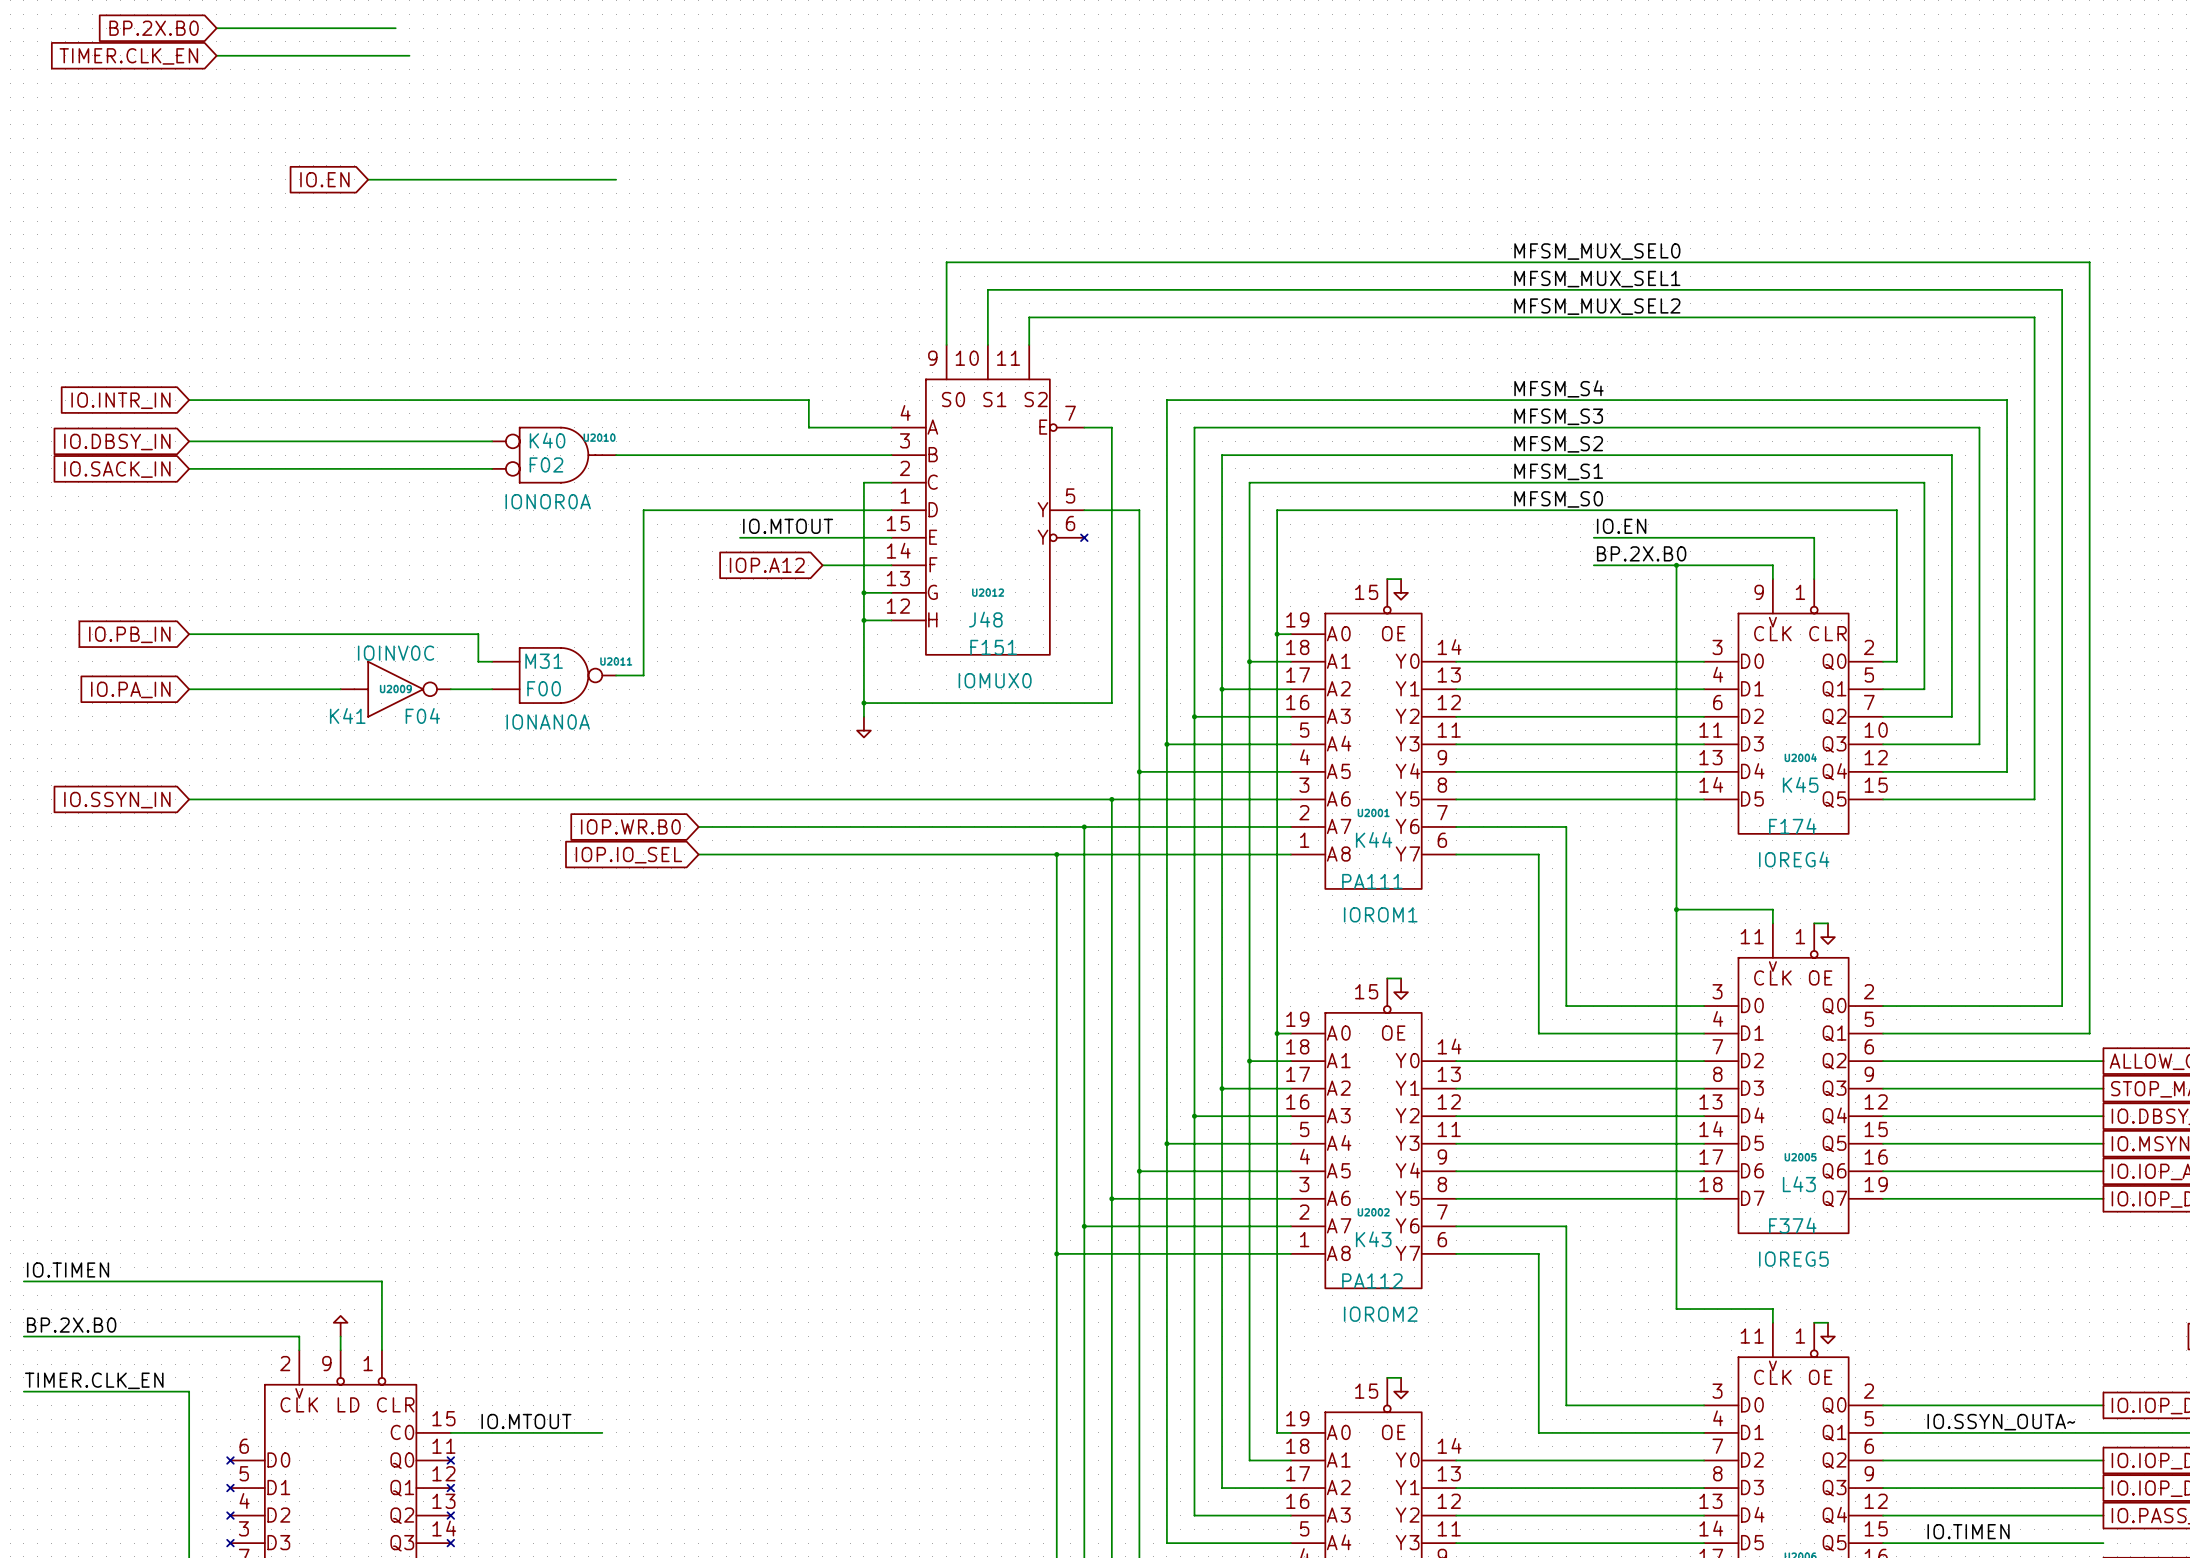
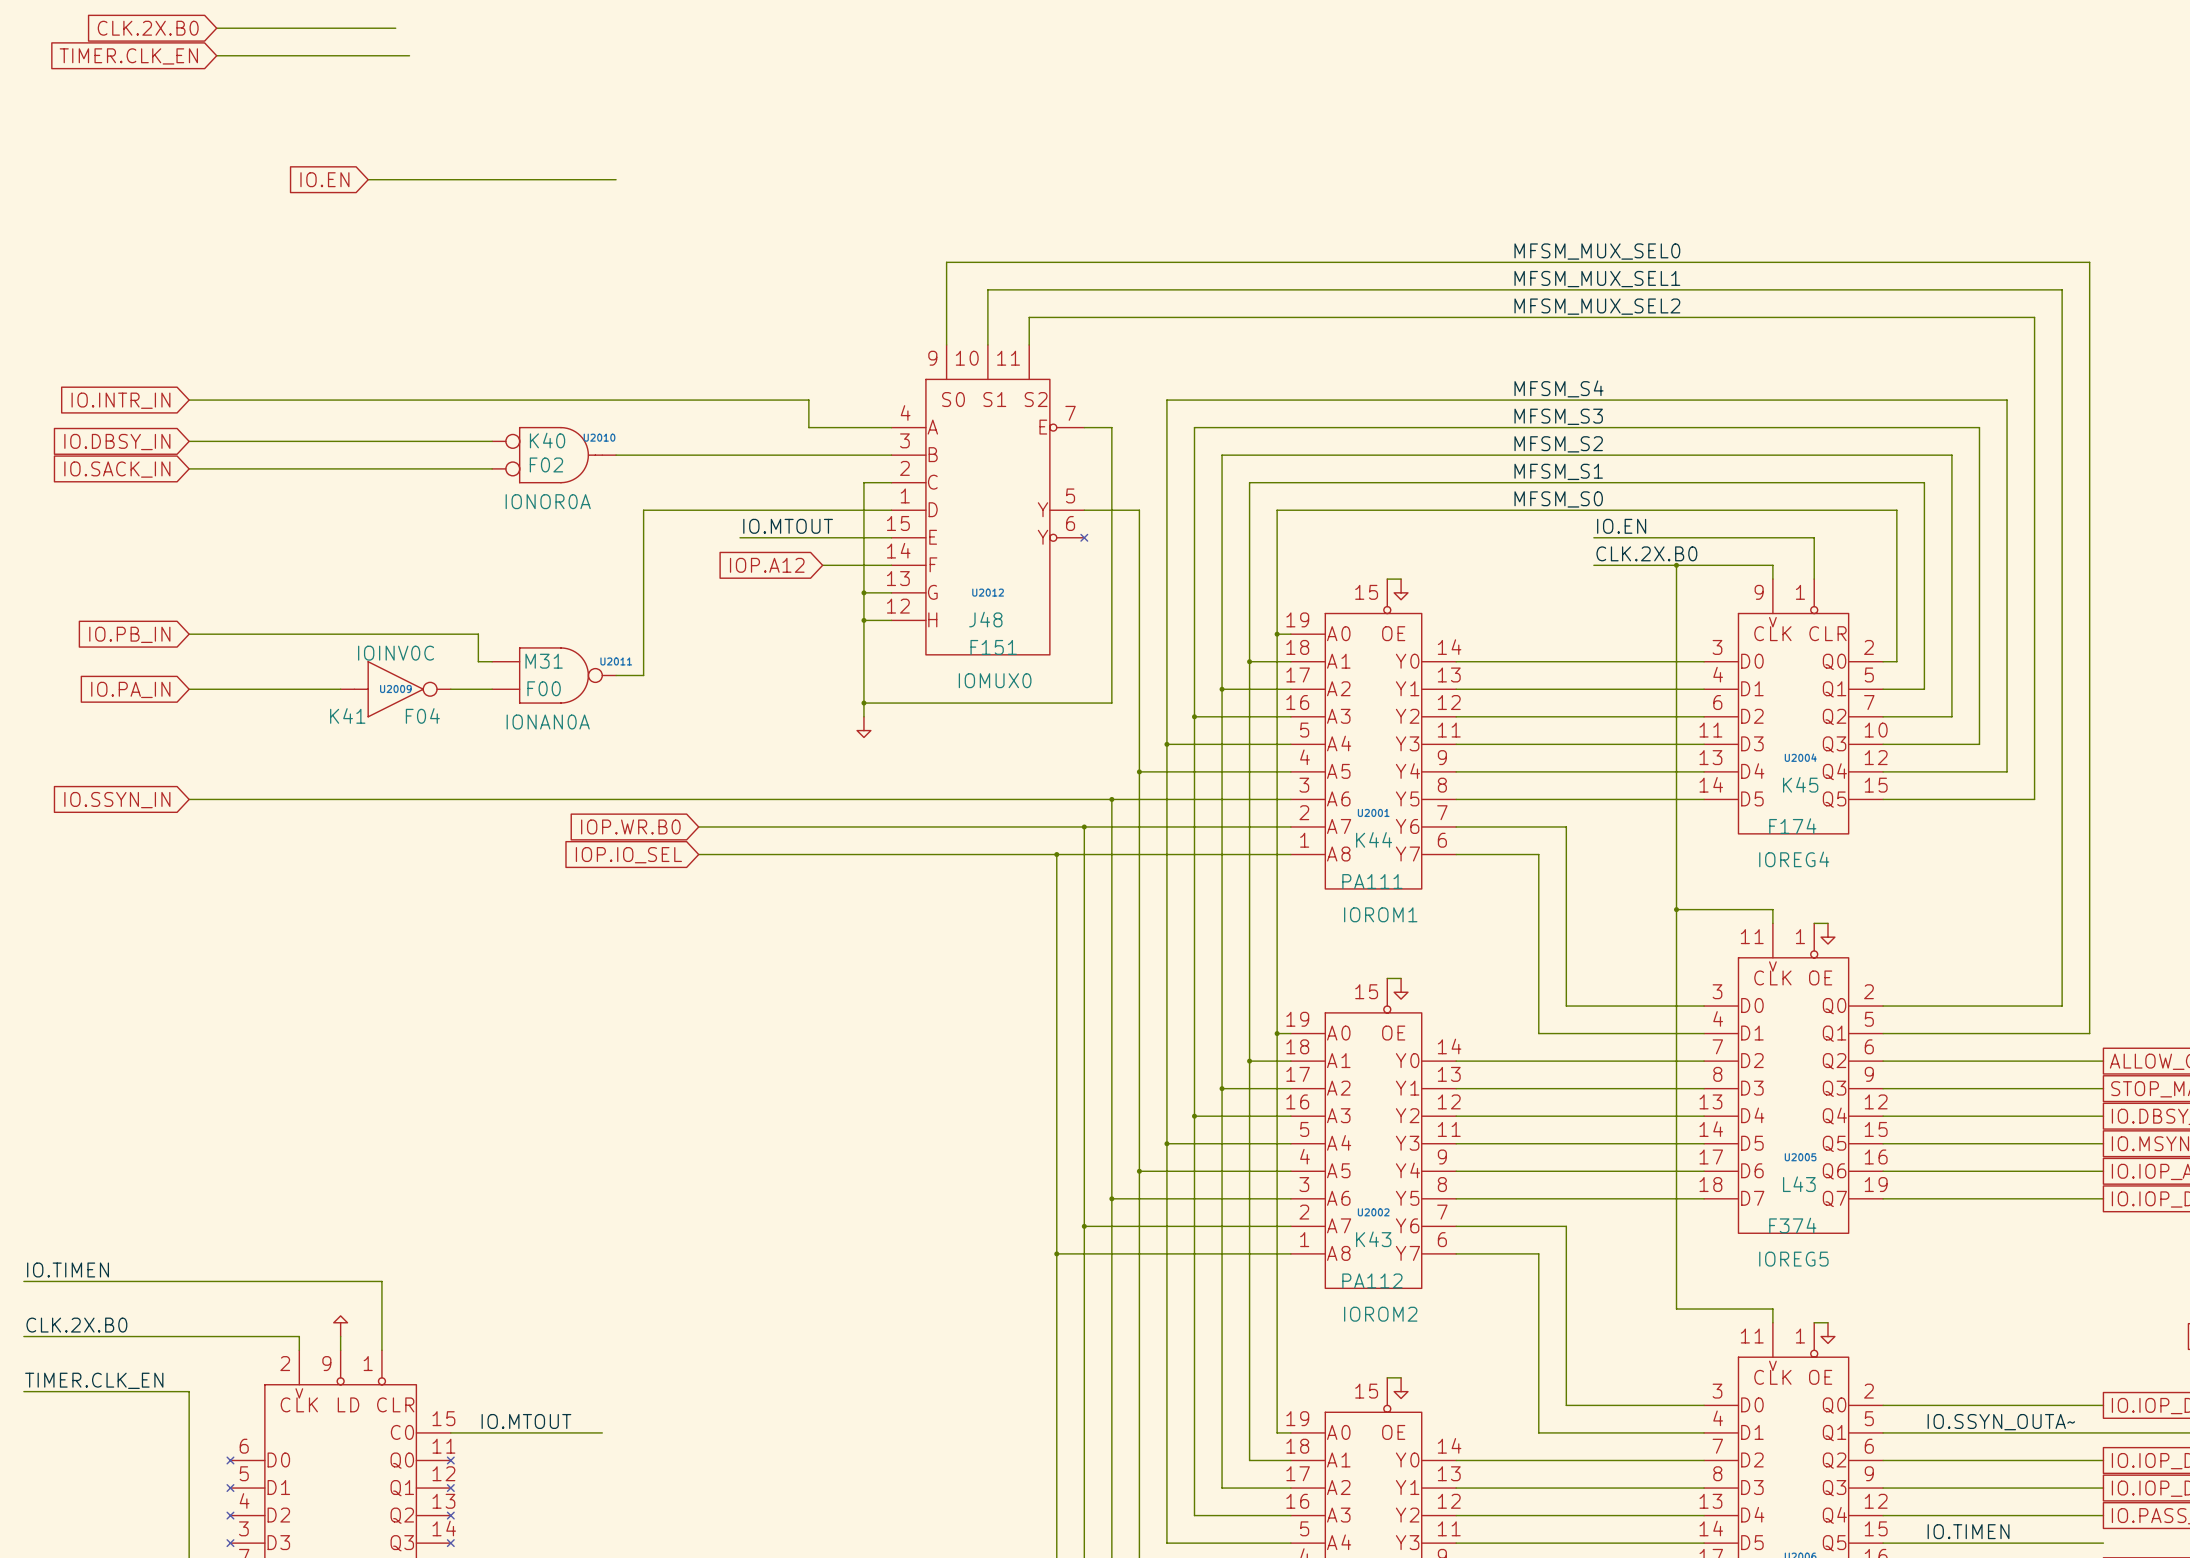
global label: BP.2X.B0 (154, 28) -> CLK.2X.B0 (148, 28)
label: BP.2X.B0 (1641, 553) -> CLK.2X.B0 (1646, 553)
label: BP.2X.B0 (71, 1325) -> CLK.2X.B0 (76, 1325)

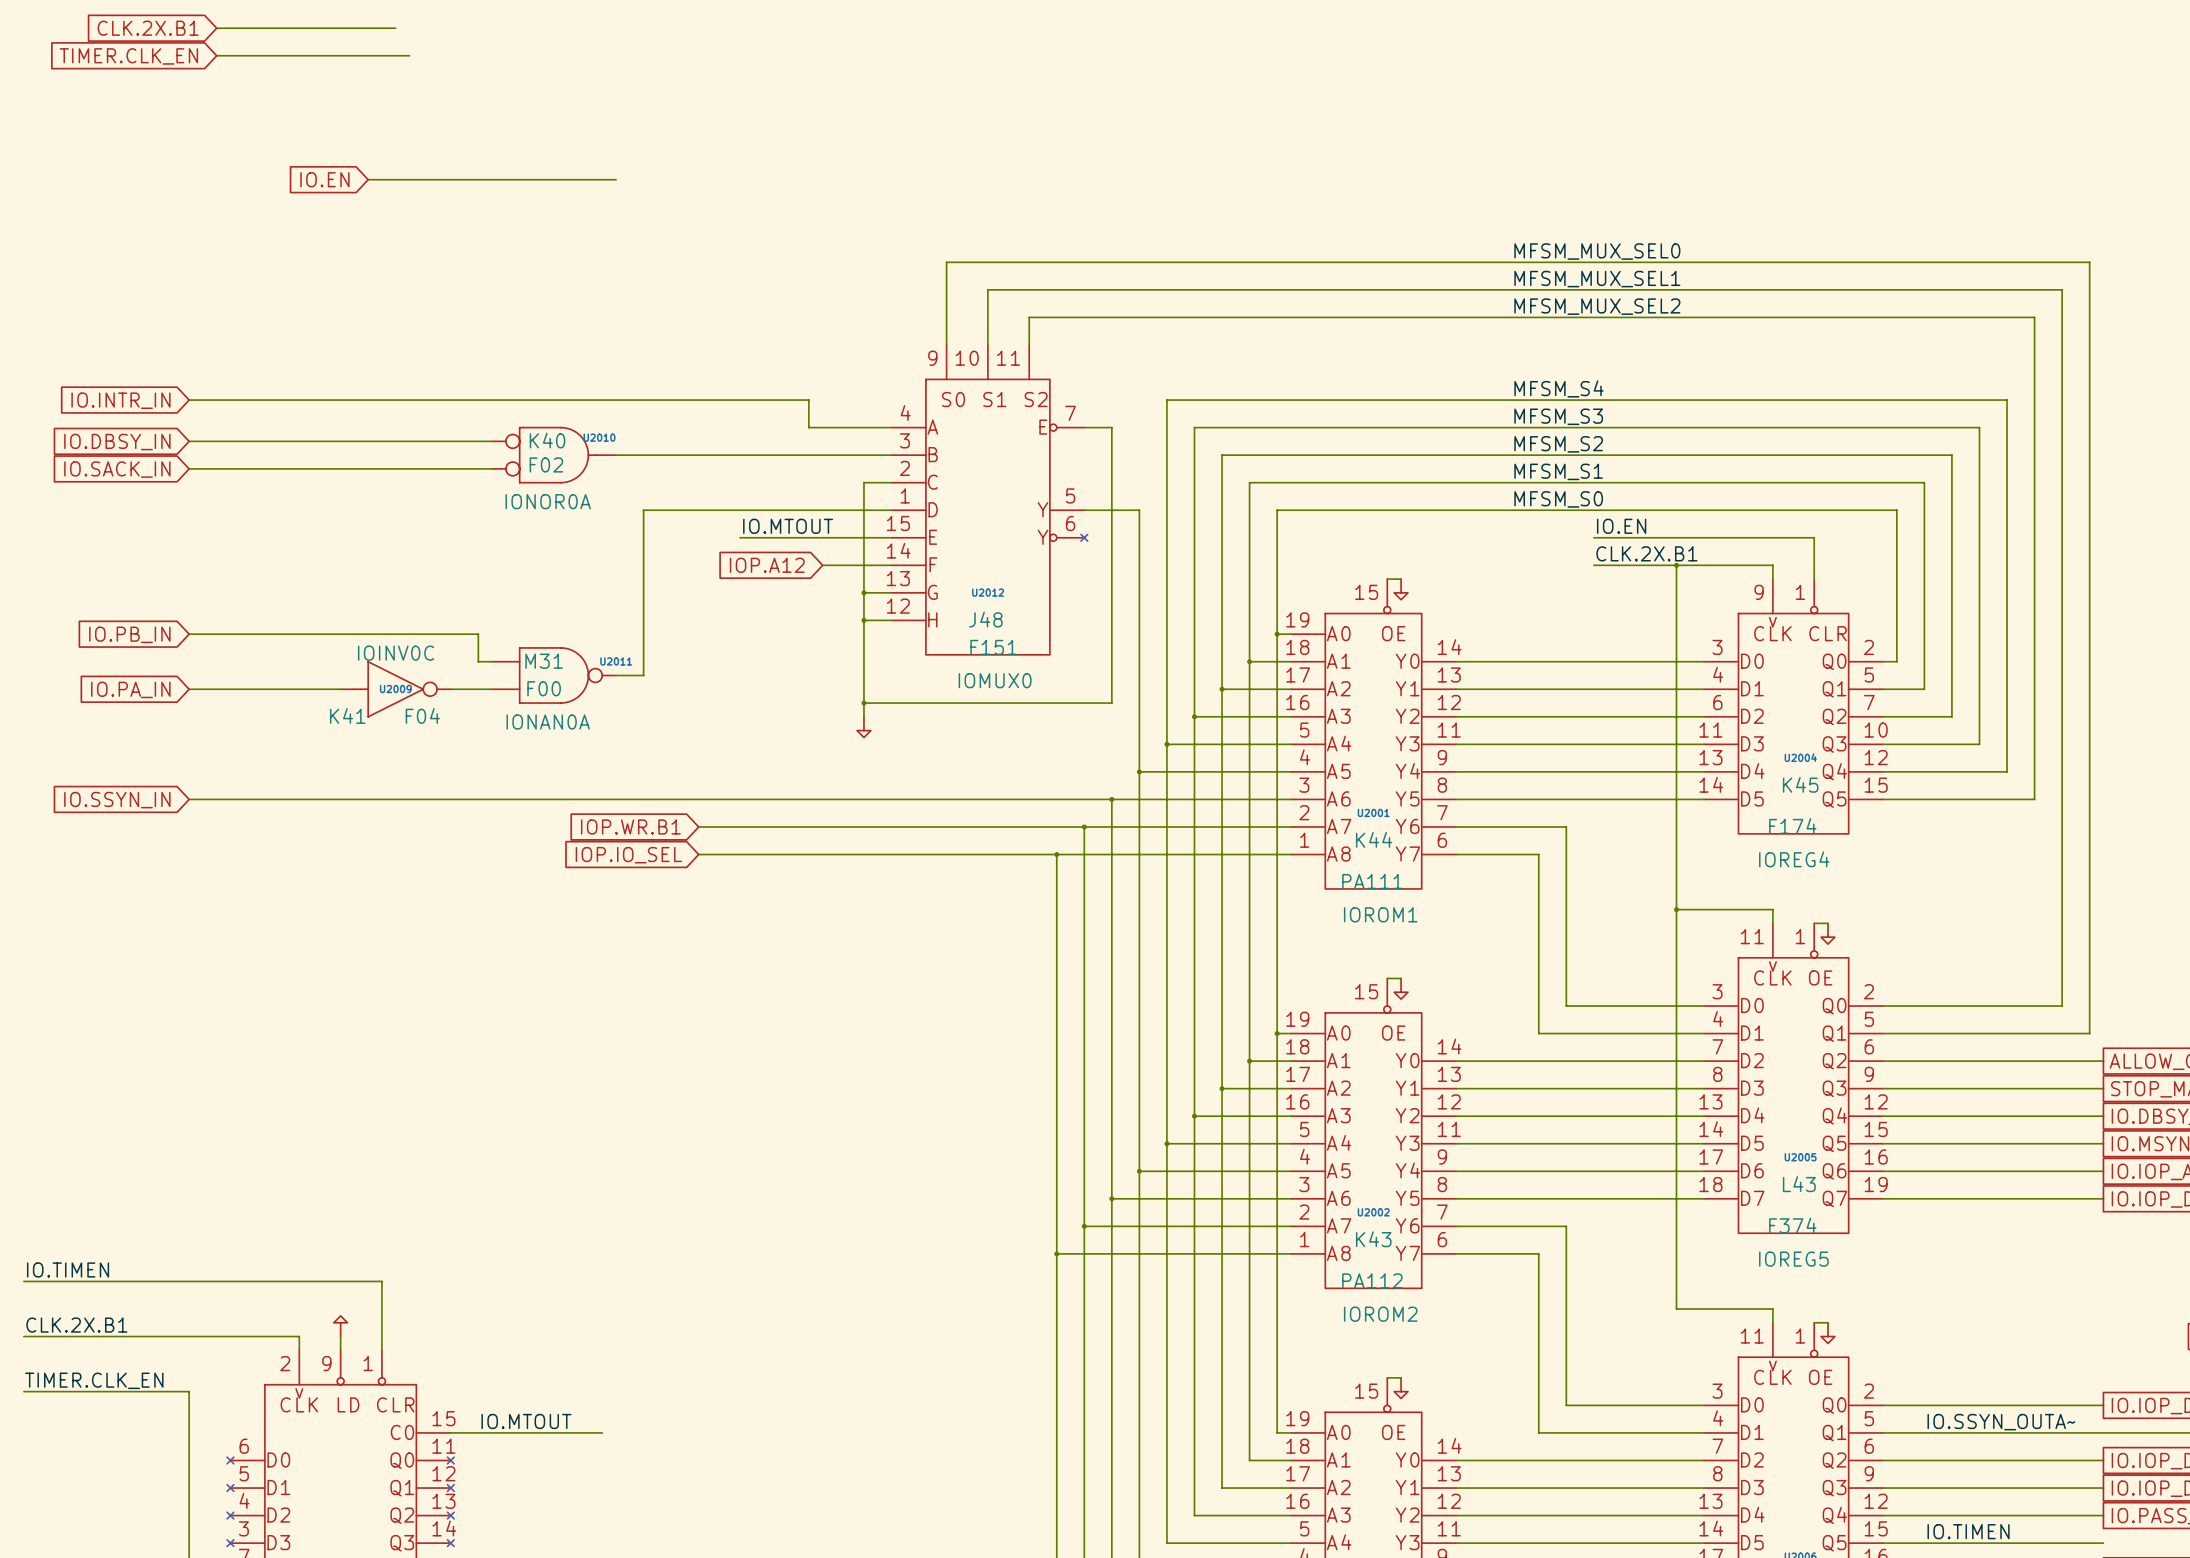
global label: CLK.2X.B0 (148, 28) -> CLK.2X.B1 (148, 28)
label: CLK.2X.B0 (1646, 553) -> CLK.2X.B1 (1646, 553)
global label: IOP.WR.B0 (630, 826) -> IOP.WR.B1 (630, 826)
label: CLK.2X.B0 (76, 1325) -> CLK.2X.B1 (76, 1325)

